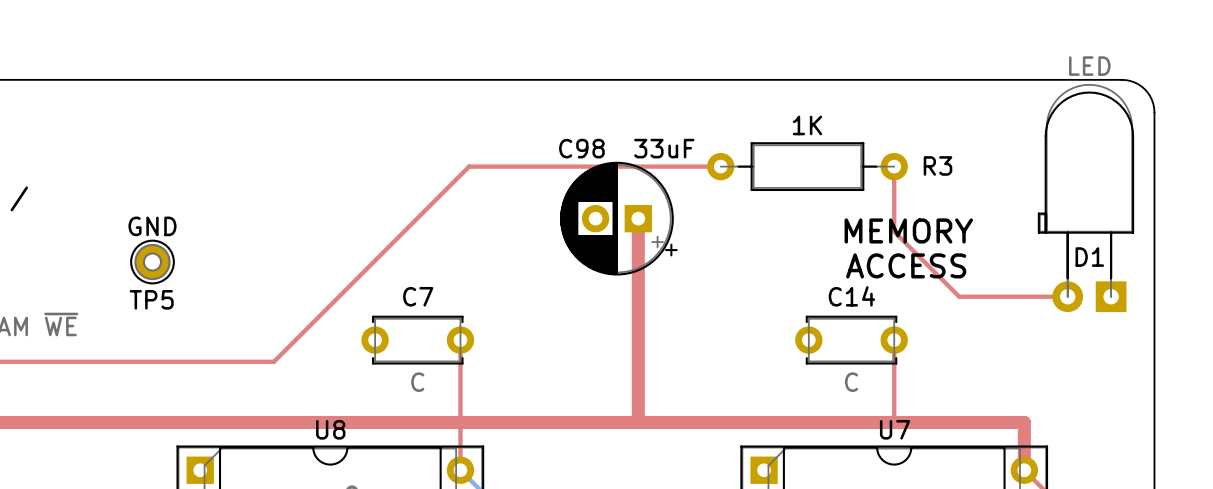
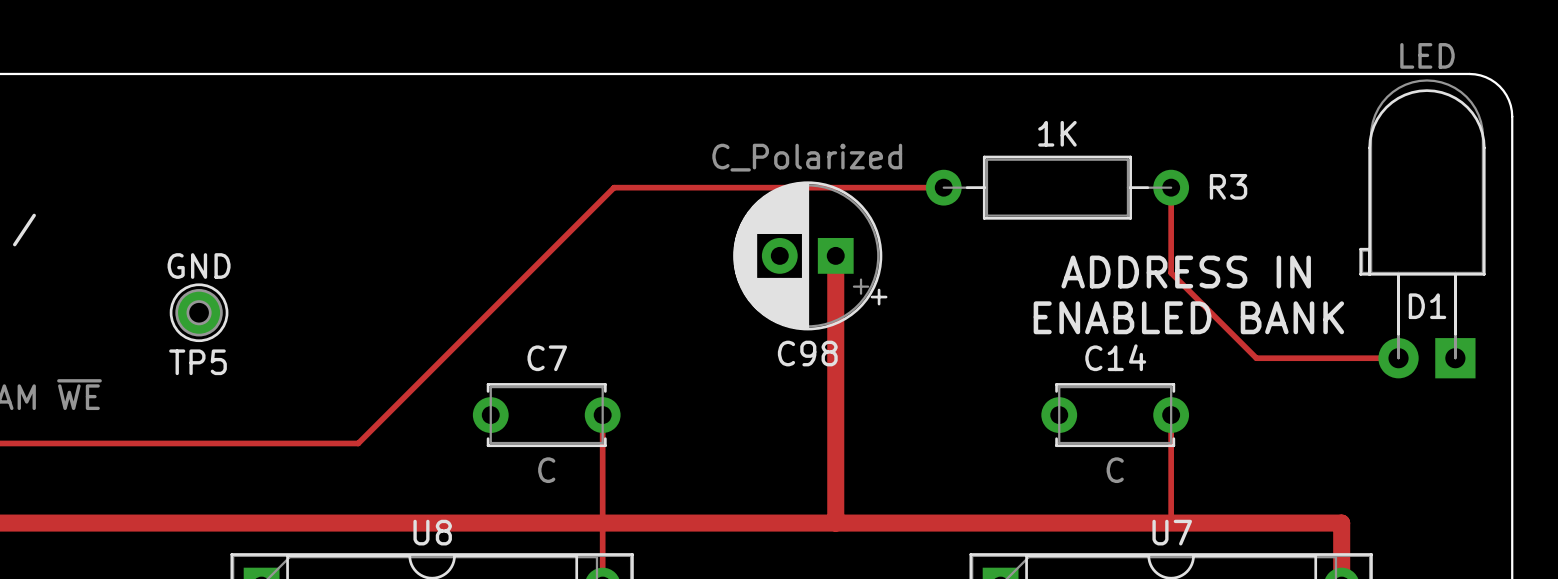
C98 name position: C98 (581, 148) -> C98 (807, 353)
C98 value: 33uF (664, 148) -> C_Polarized (807, 157)
text: MEMORY (908, 230) -> ADDRESS IN (1186, 272)
text: ACCESS (906, 265) -> ENABLED BANK (1188, 317)

